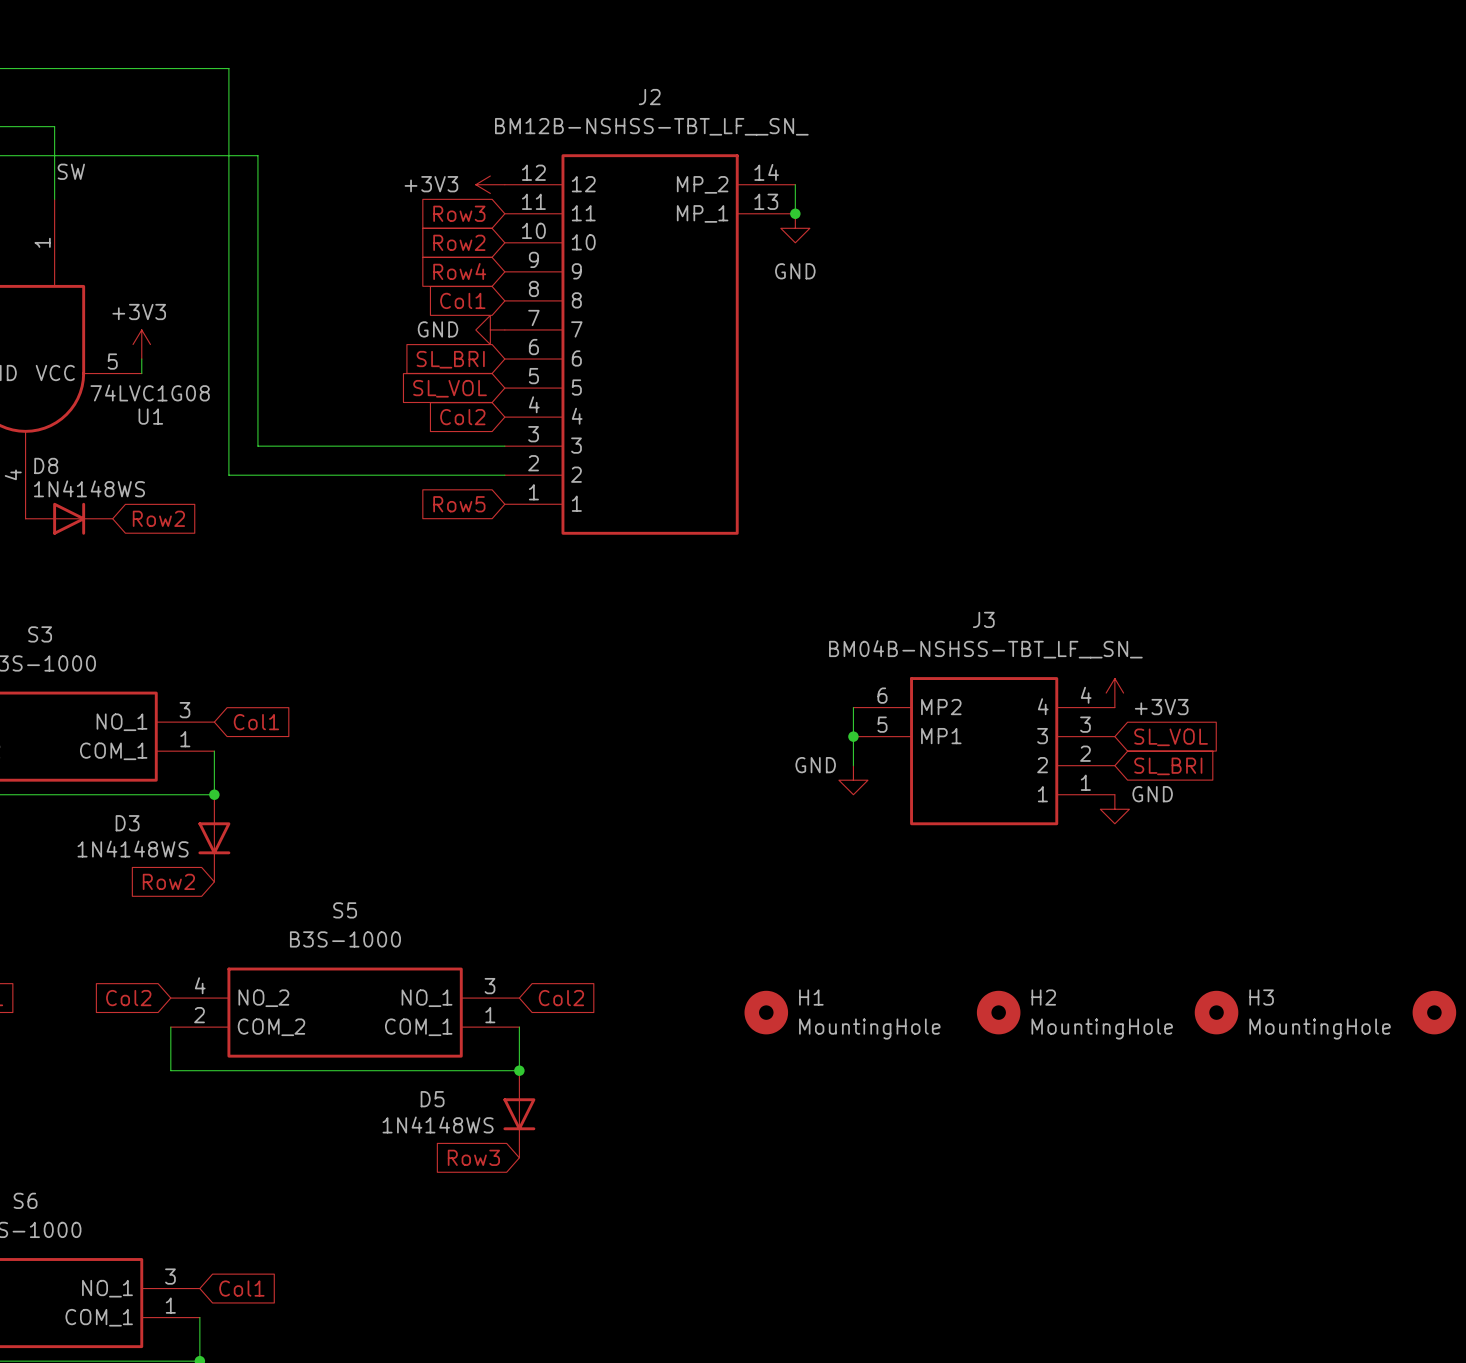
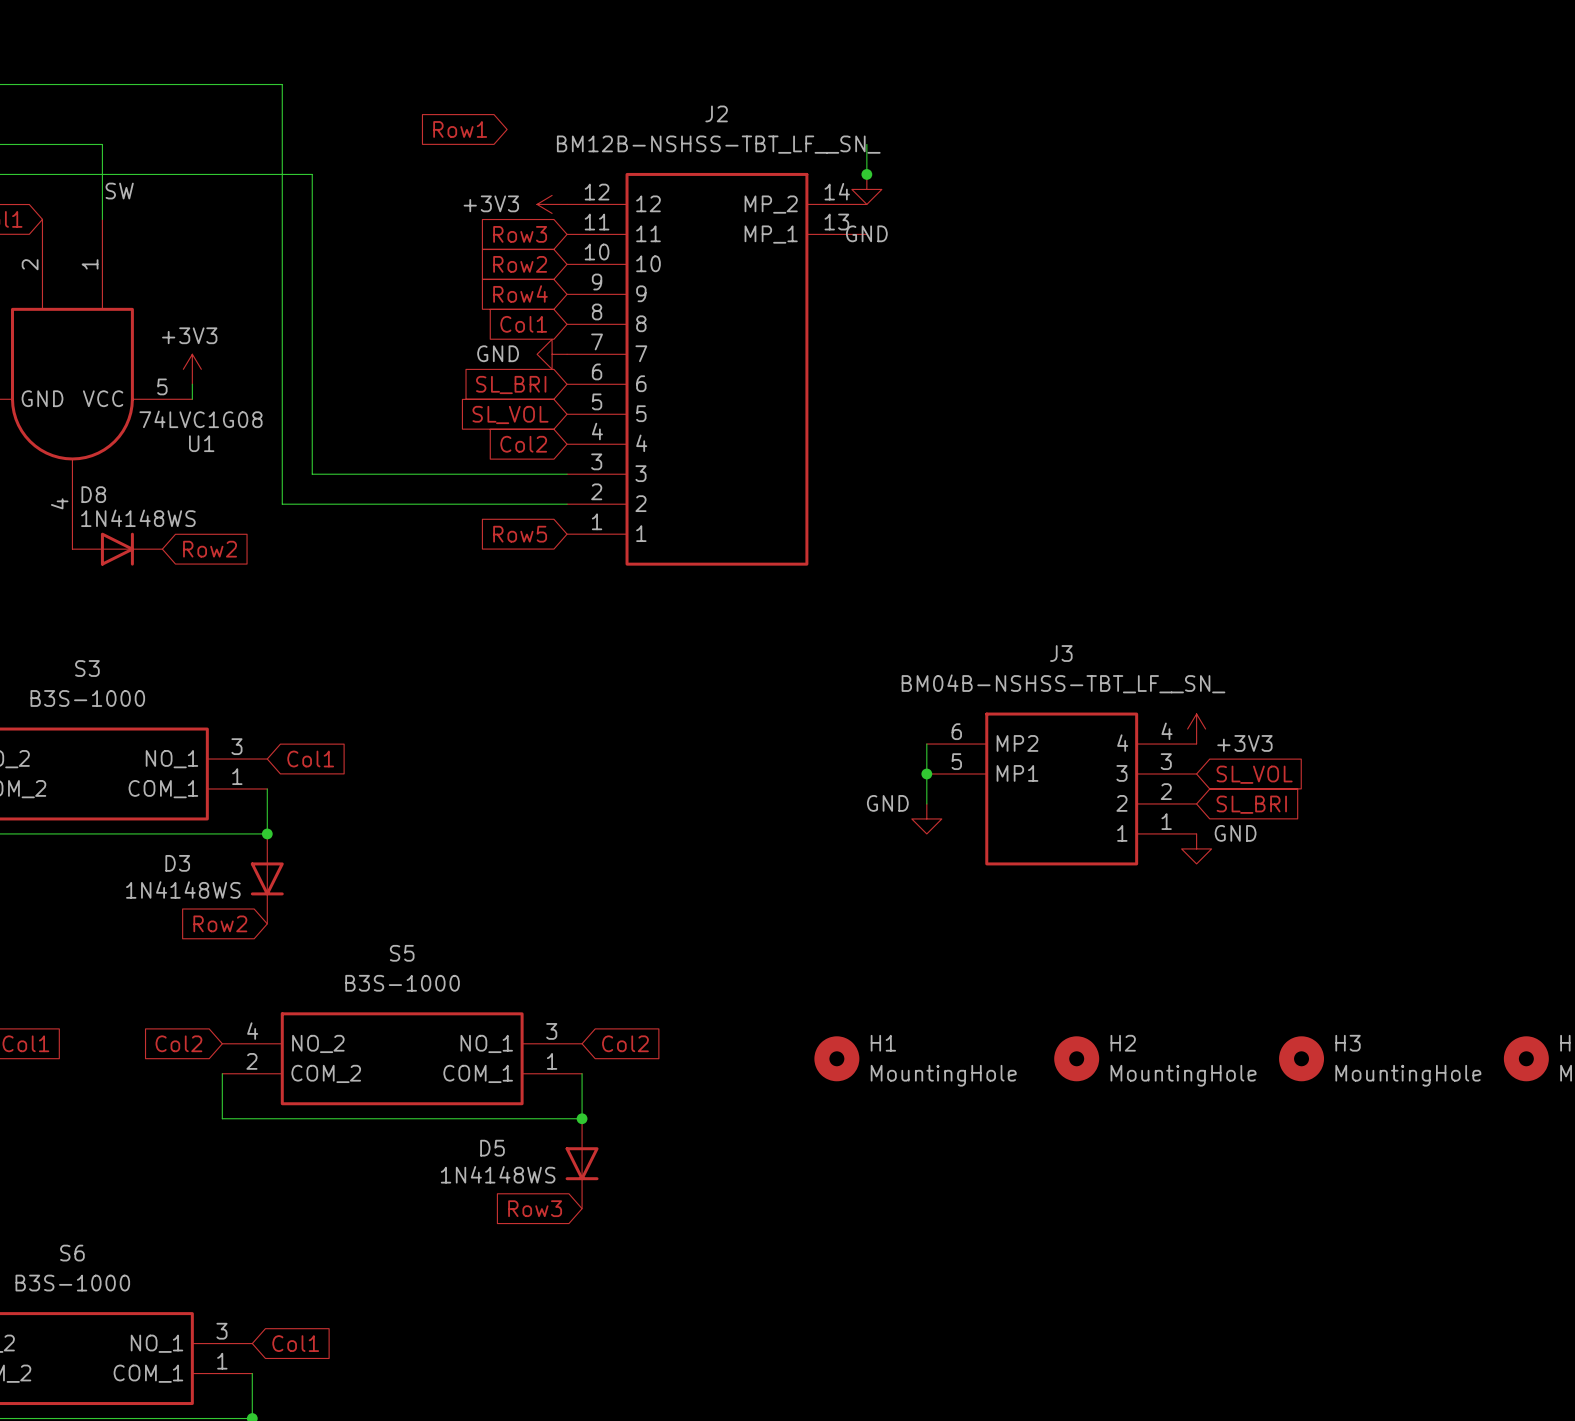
global label: none -> Row1 (460, 129)
wire: (795, 184) (795, 213) -> (866, 144) (866, 174)
junction position: (795, 213) -> (866, 174)
power symbol position: GND (795, 228) -> GND (866, 189)

